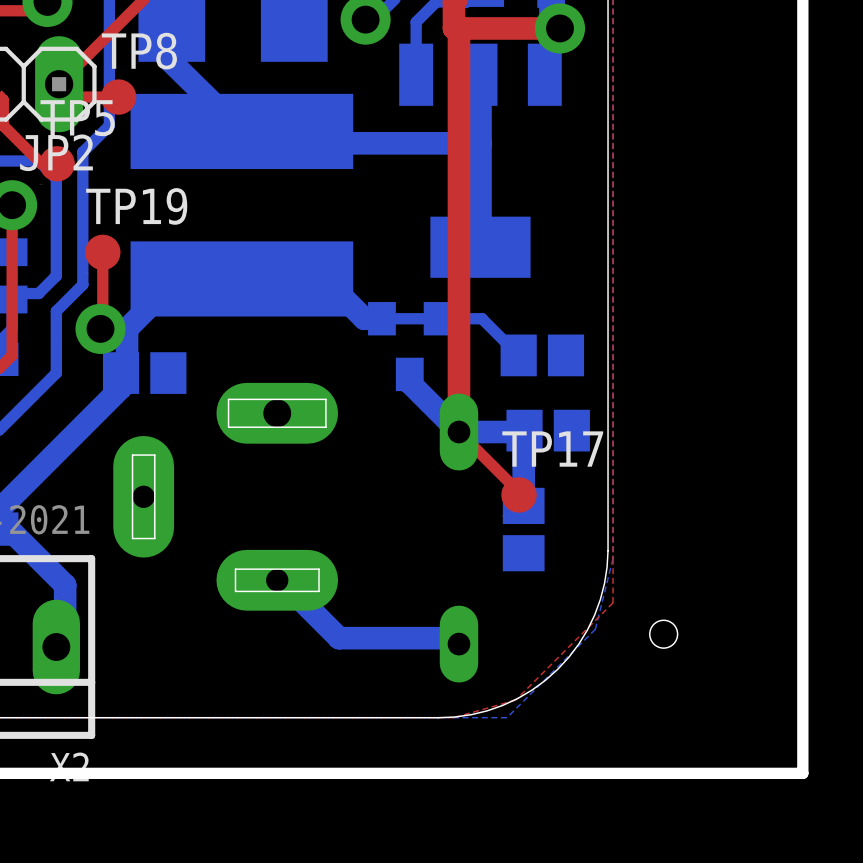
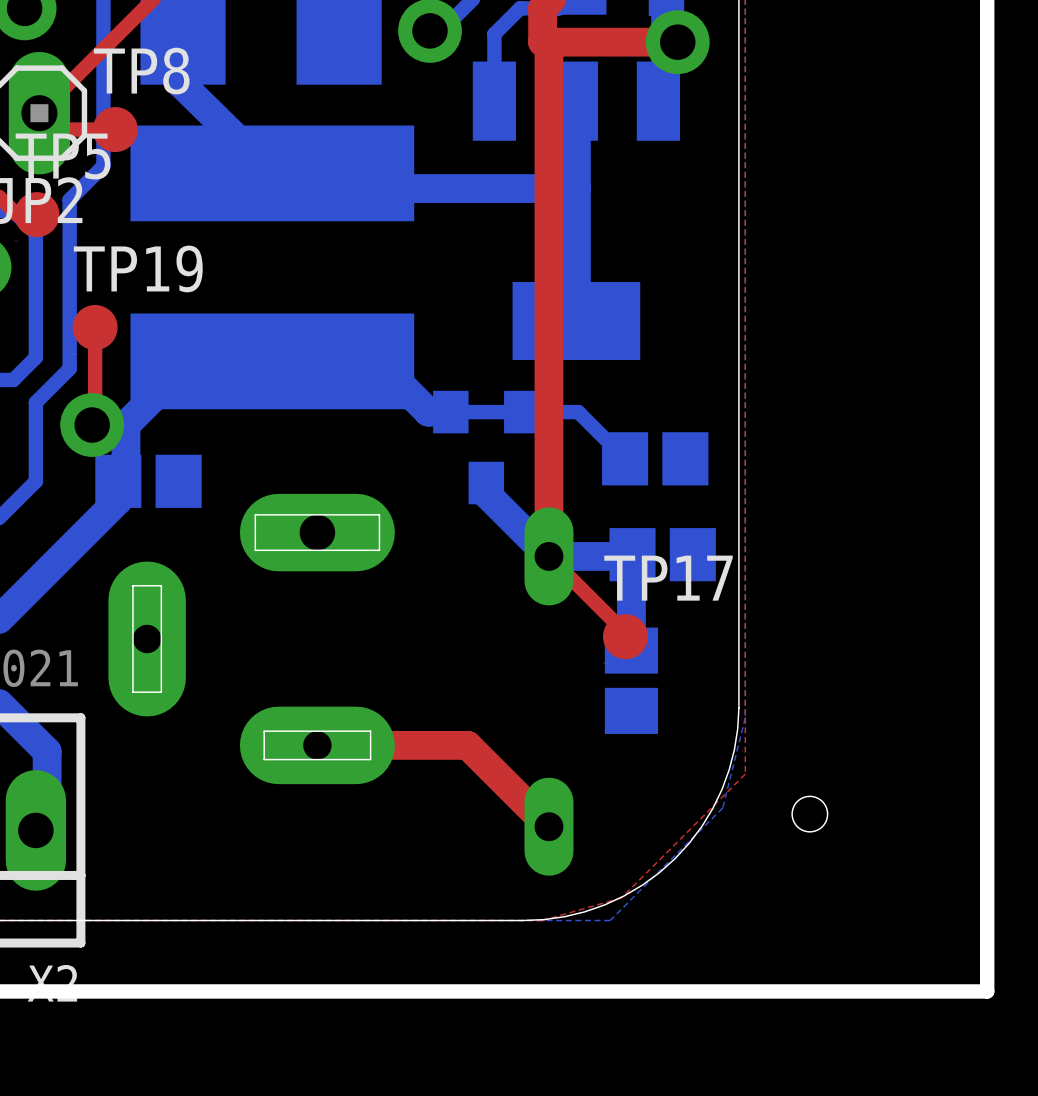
bottom track: (277, 580) (281, 580) (339, 638) (453, 638) (458, 644) -> none
top track: none -> (317, 745) (467, 745) (549, 826)

